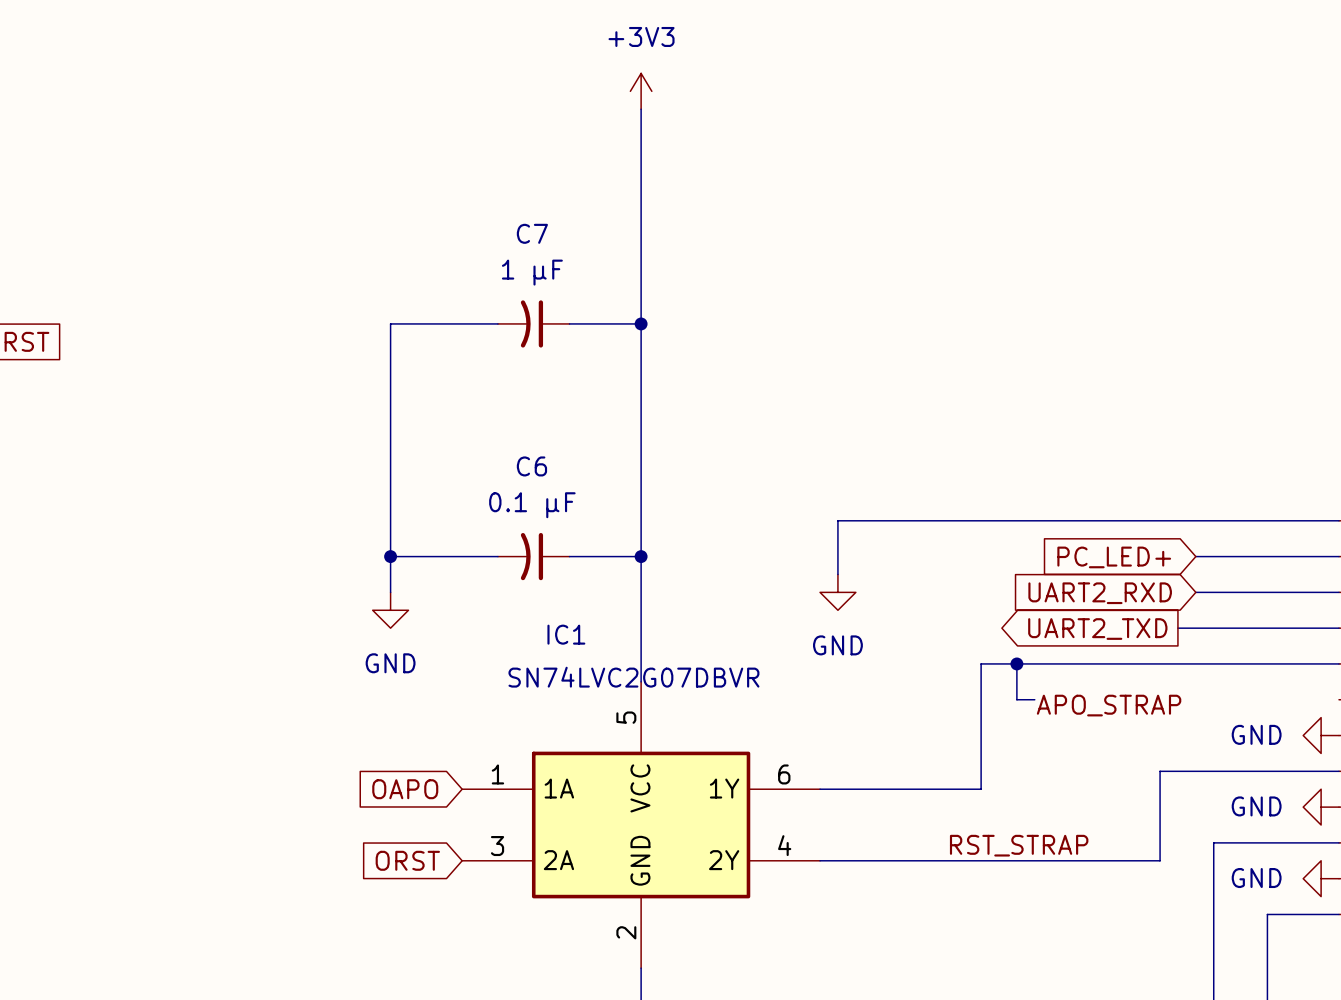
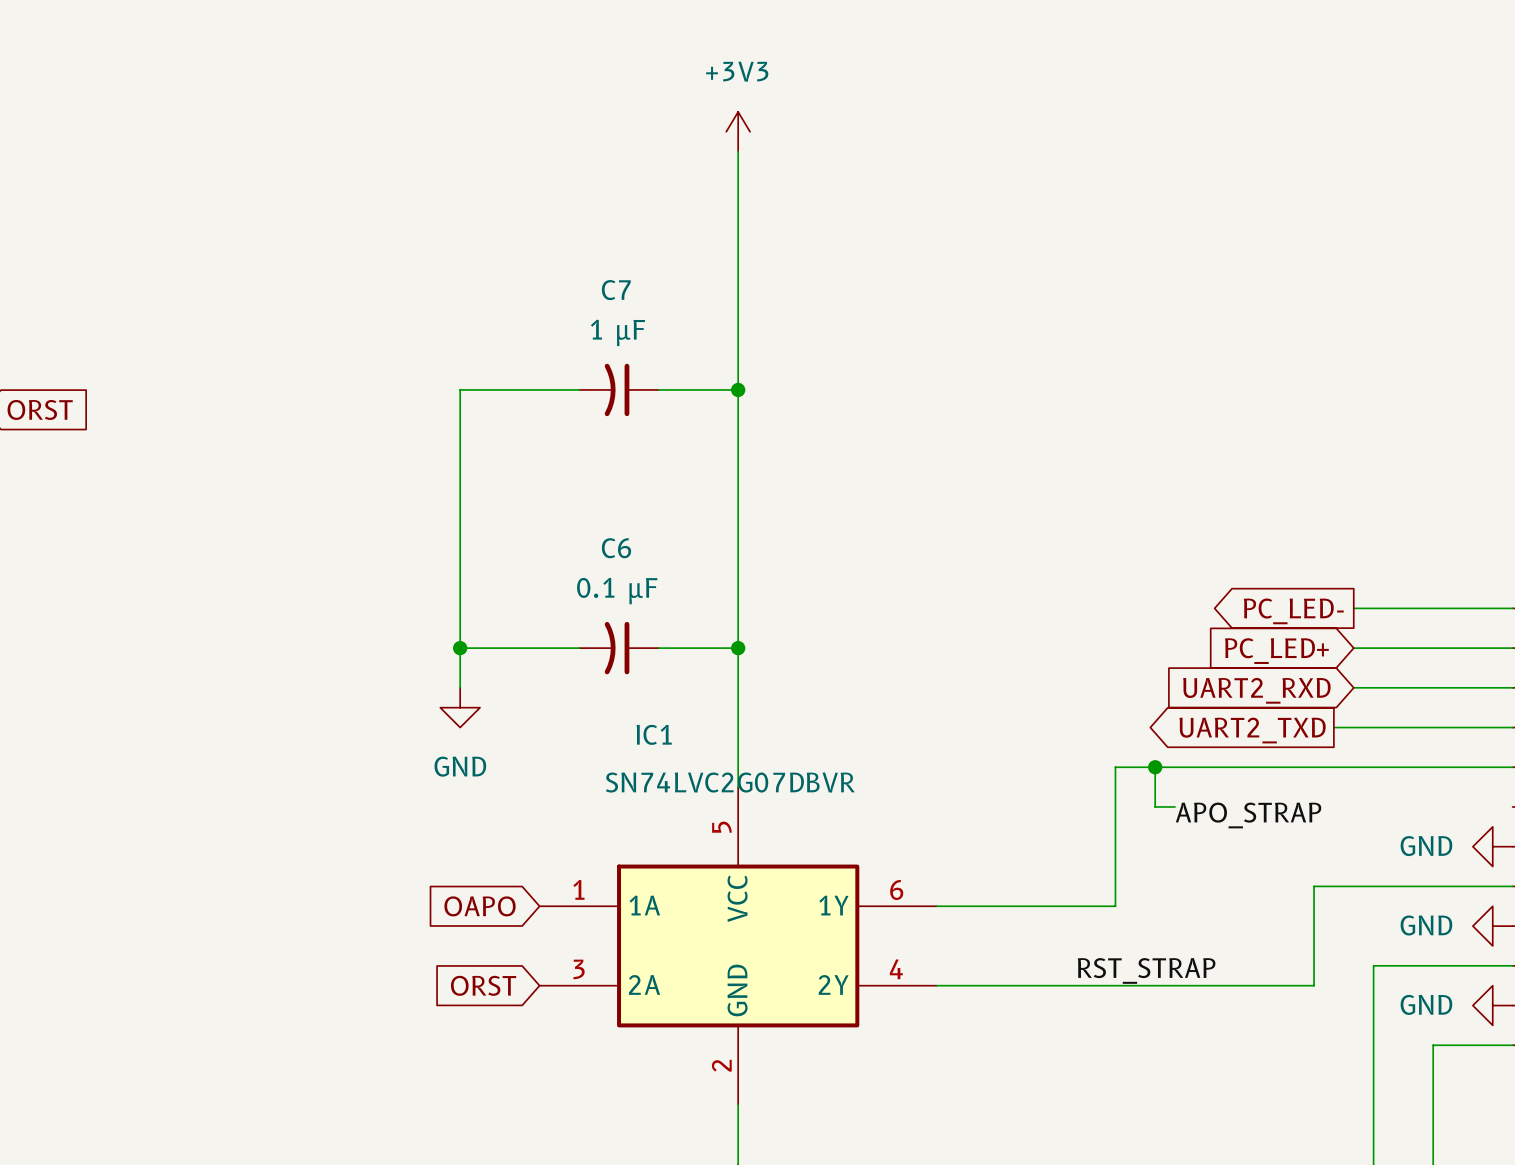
wire: (1195, 520) (837, 520) (837, 574) -> none
global label: none -> PC_LED- (1293, 611)
power symbol: GND (837, 592) -> none

